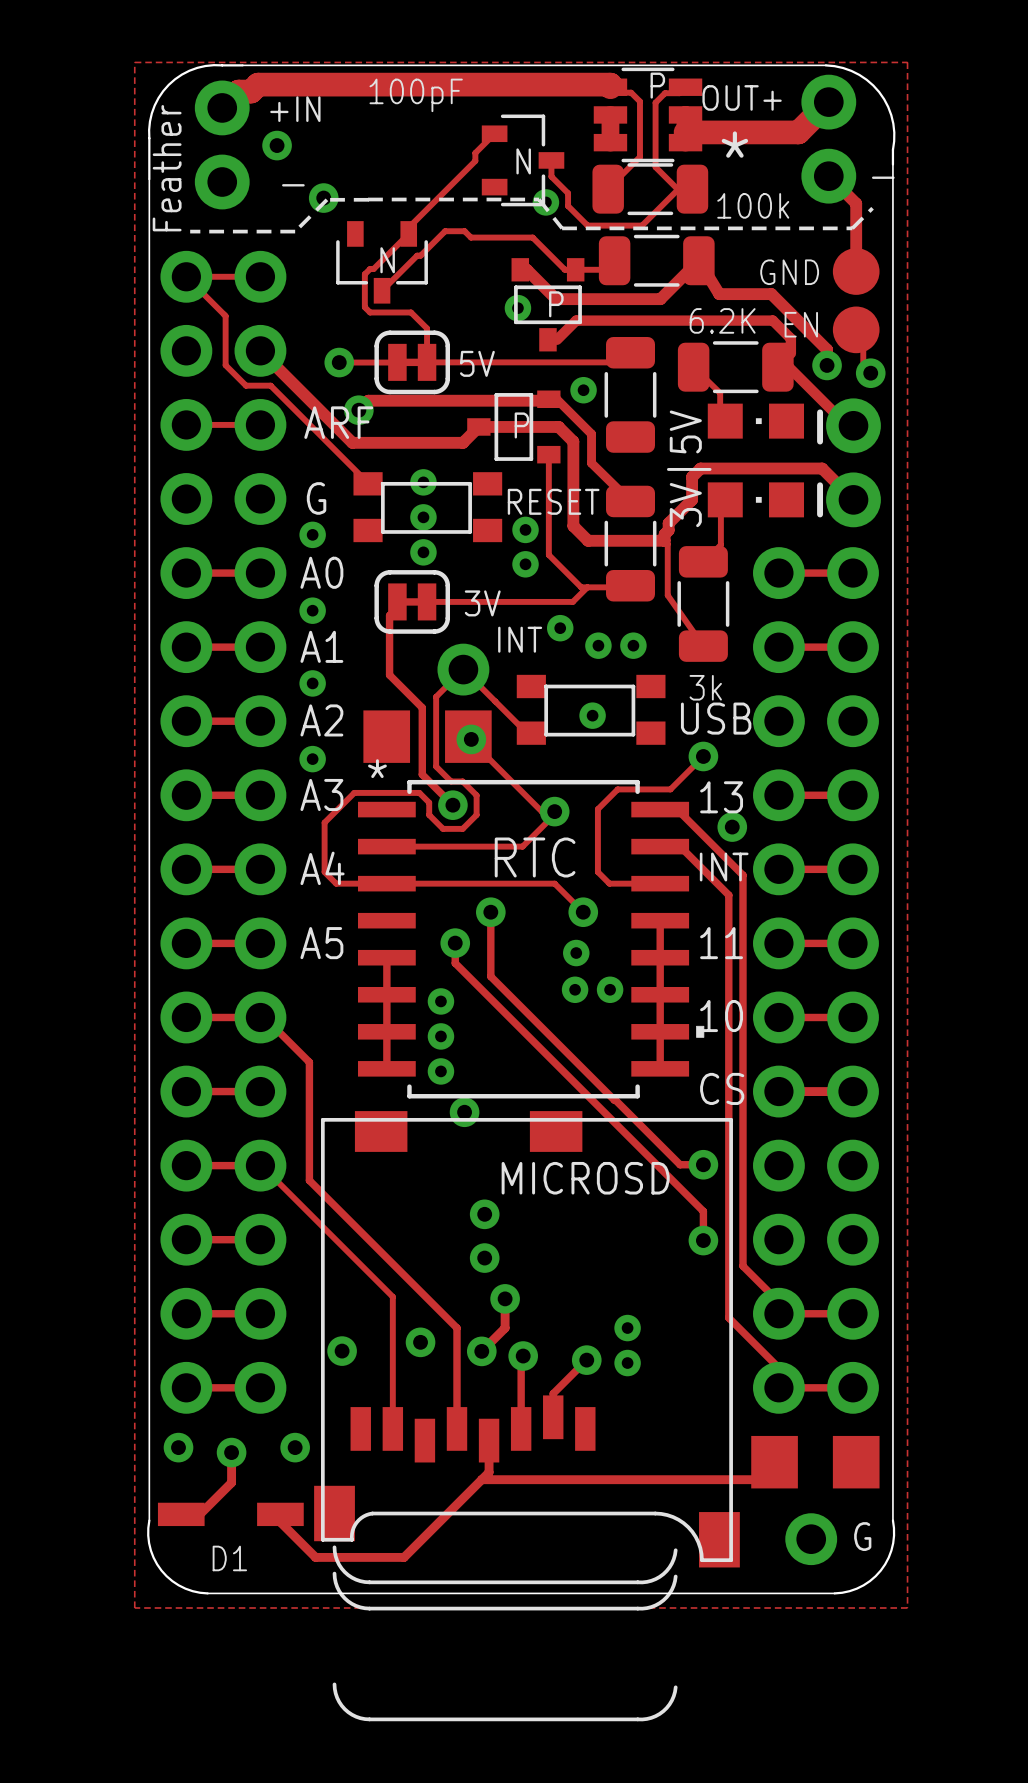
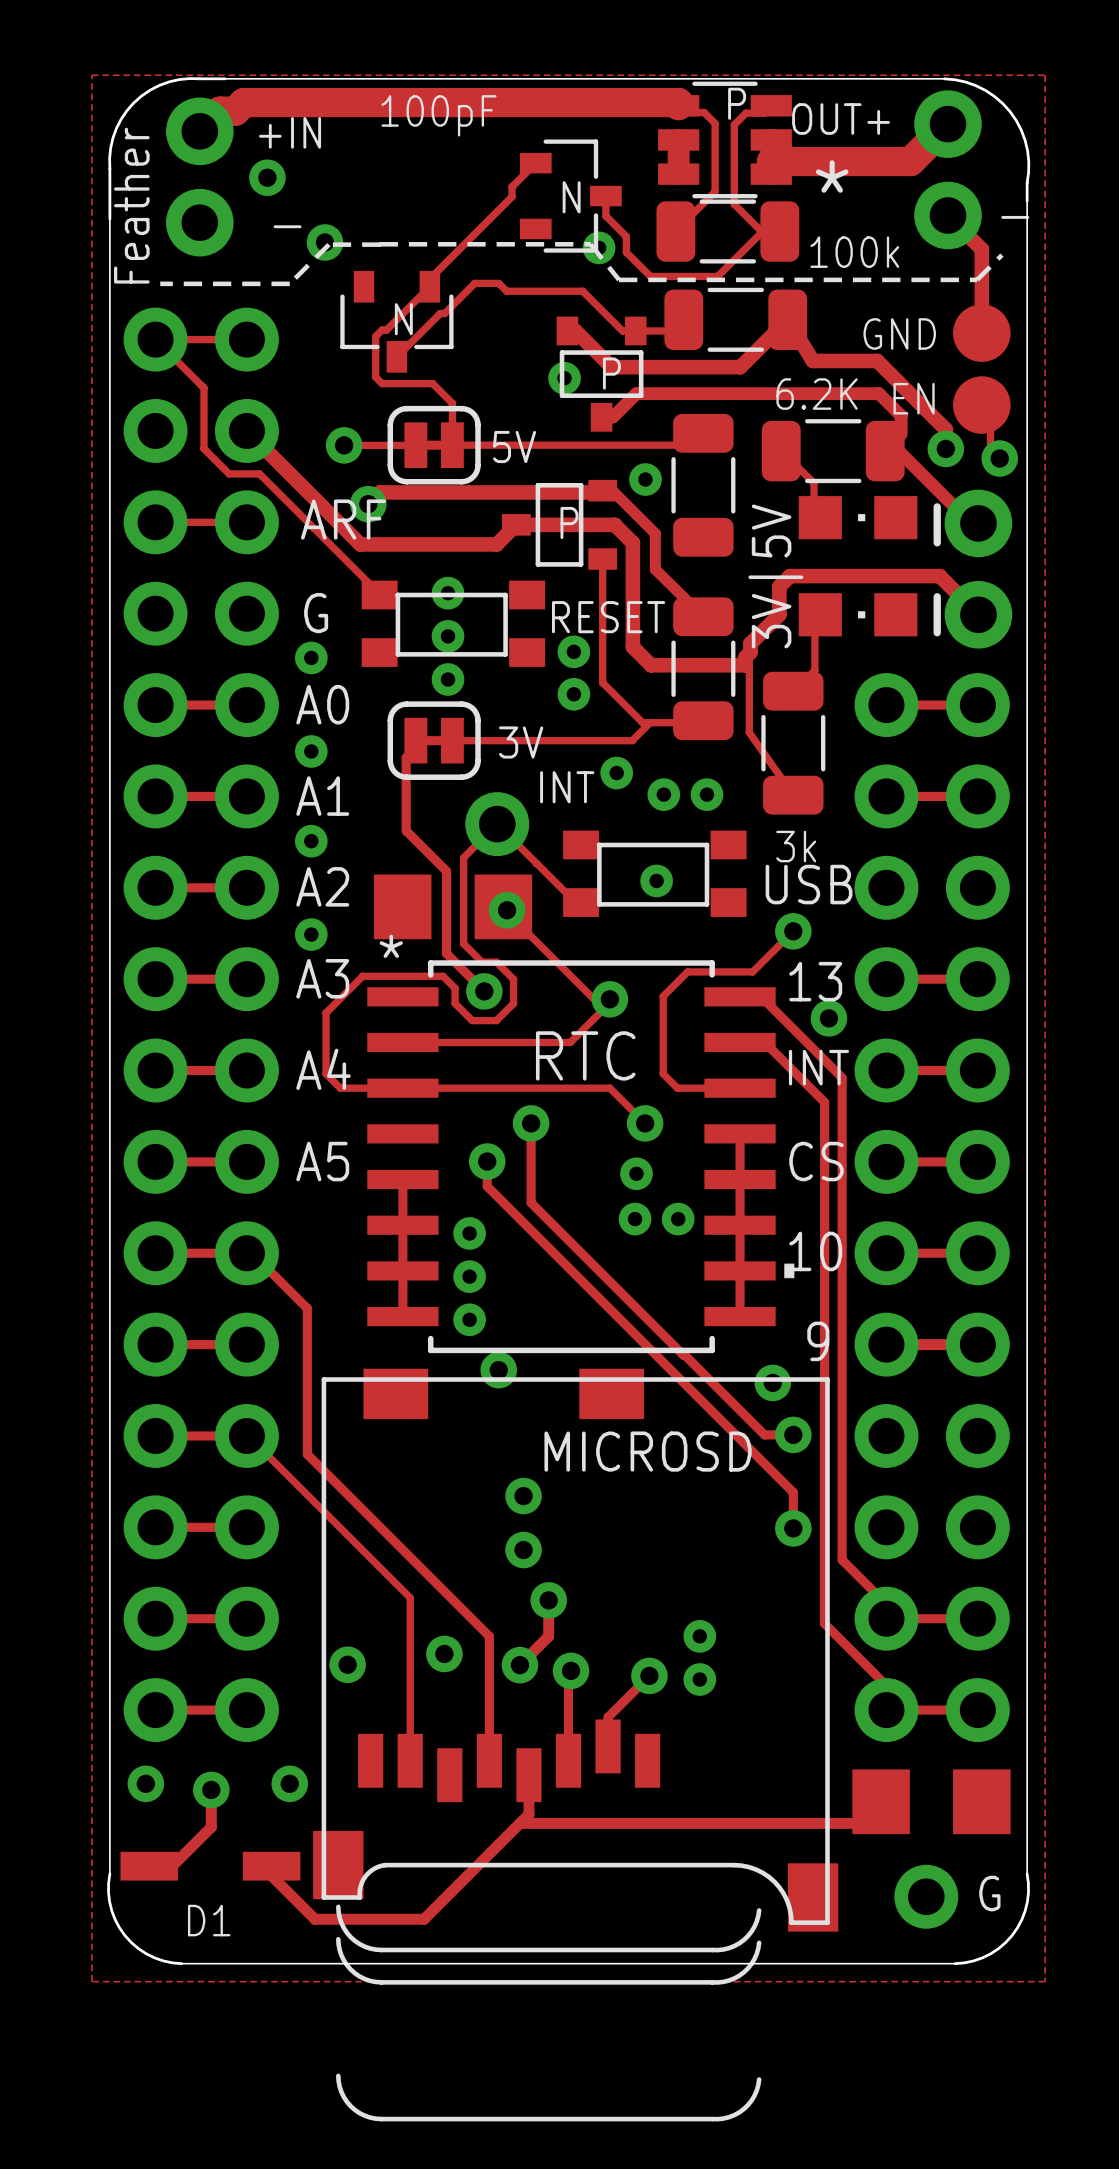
text: 11 (721, 943) -> CS (816, 1161)
text: CS (722, 1088) -> 9 (818, 1341)
via: none -> (772, 1382)

